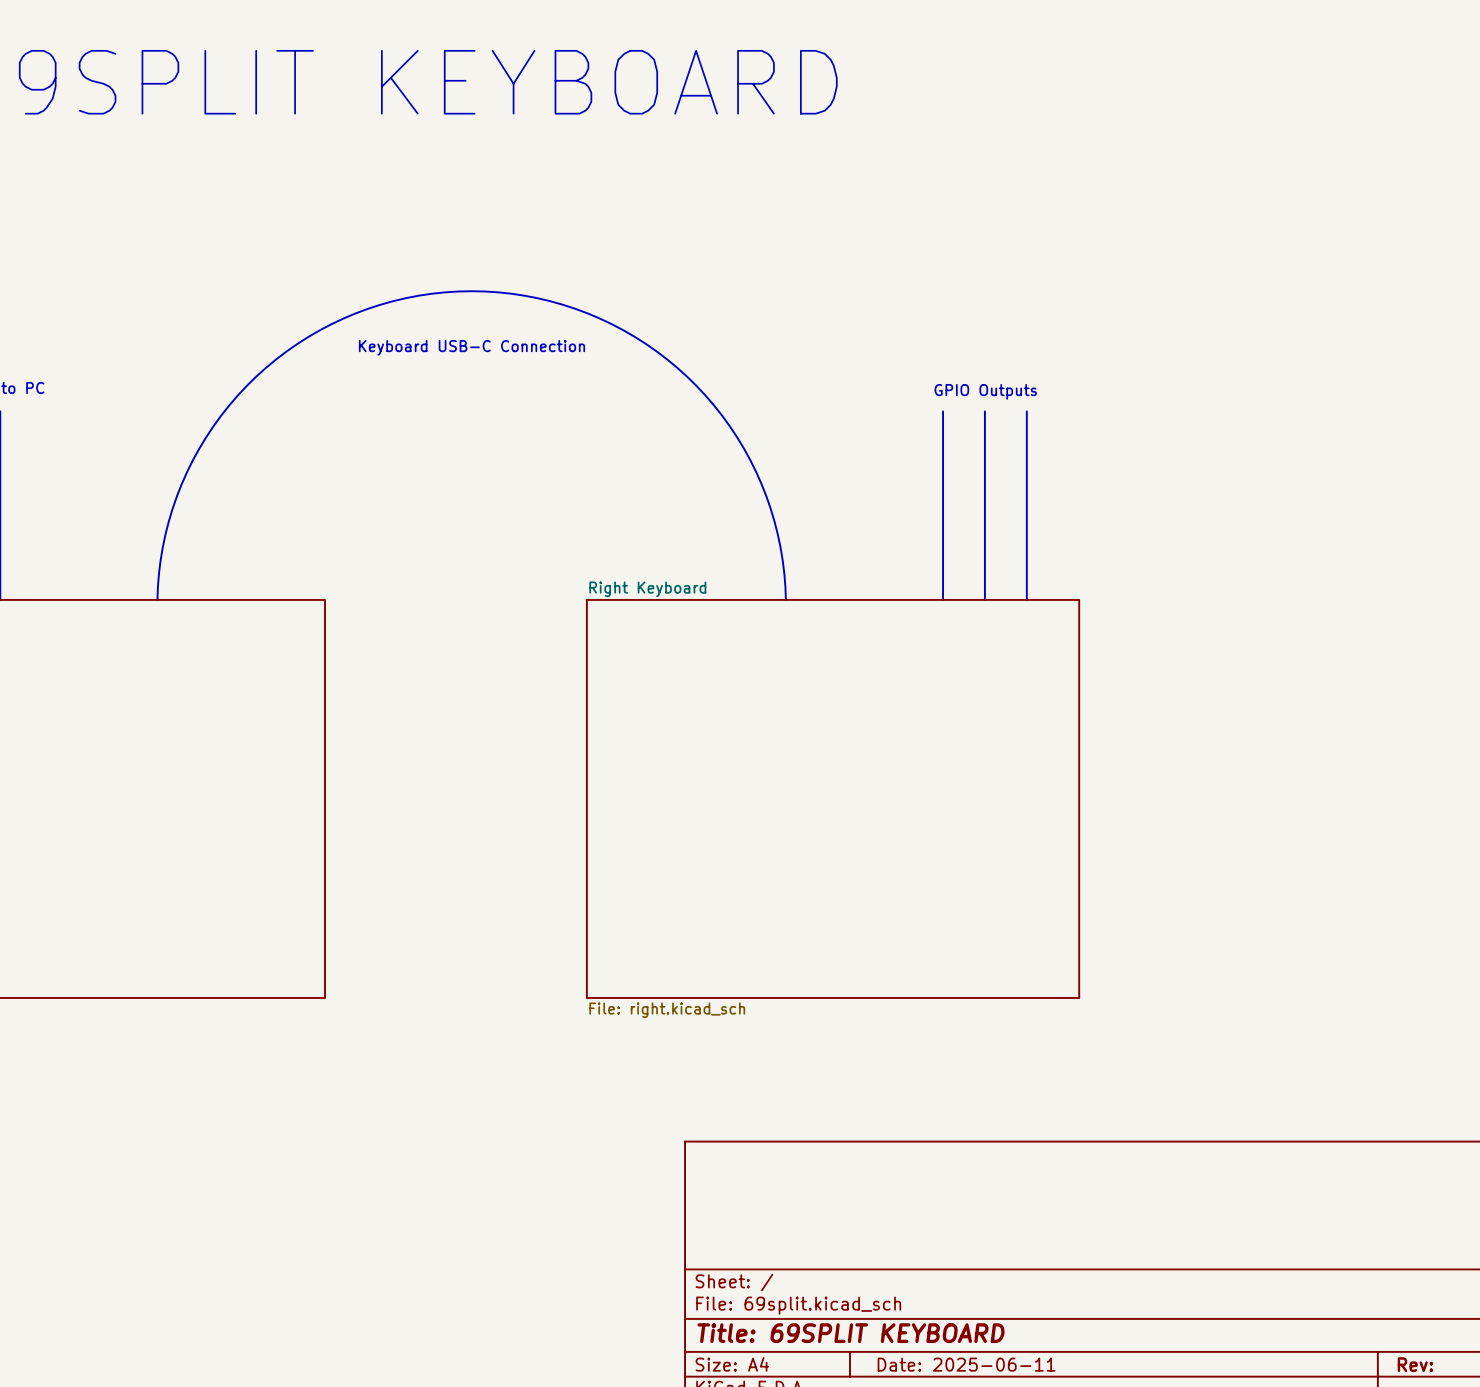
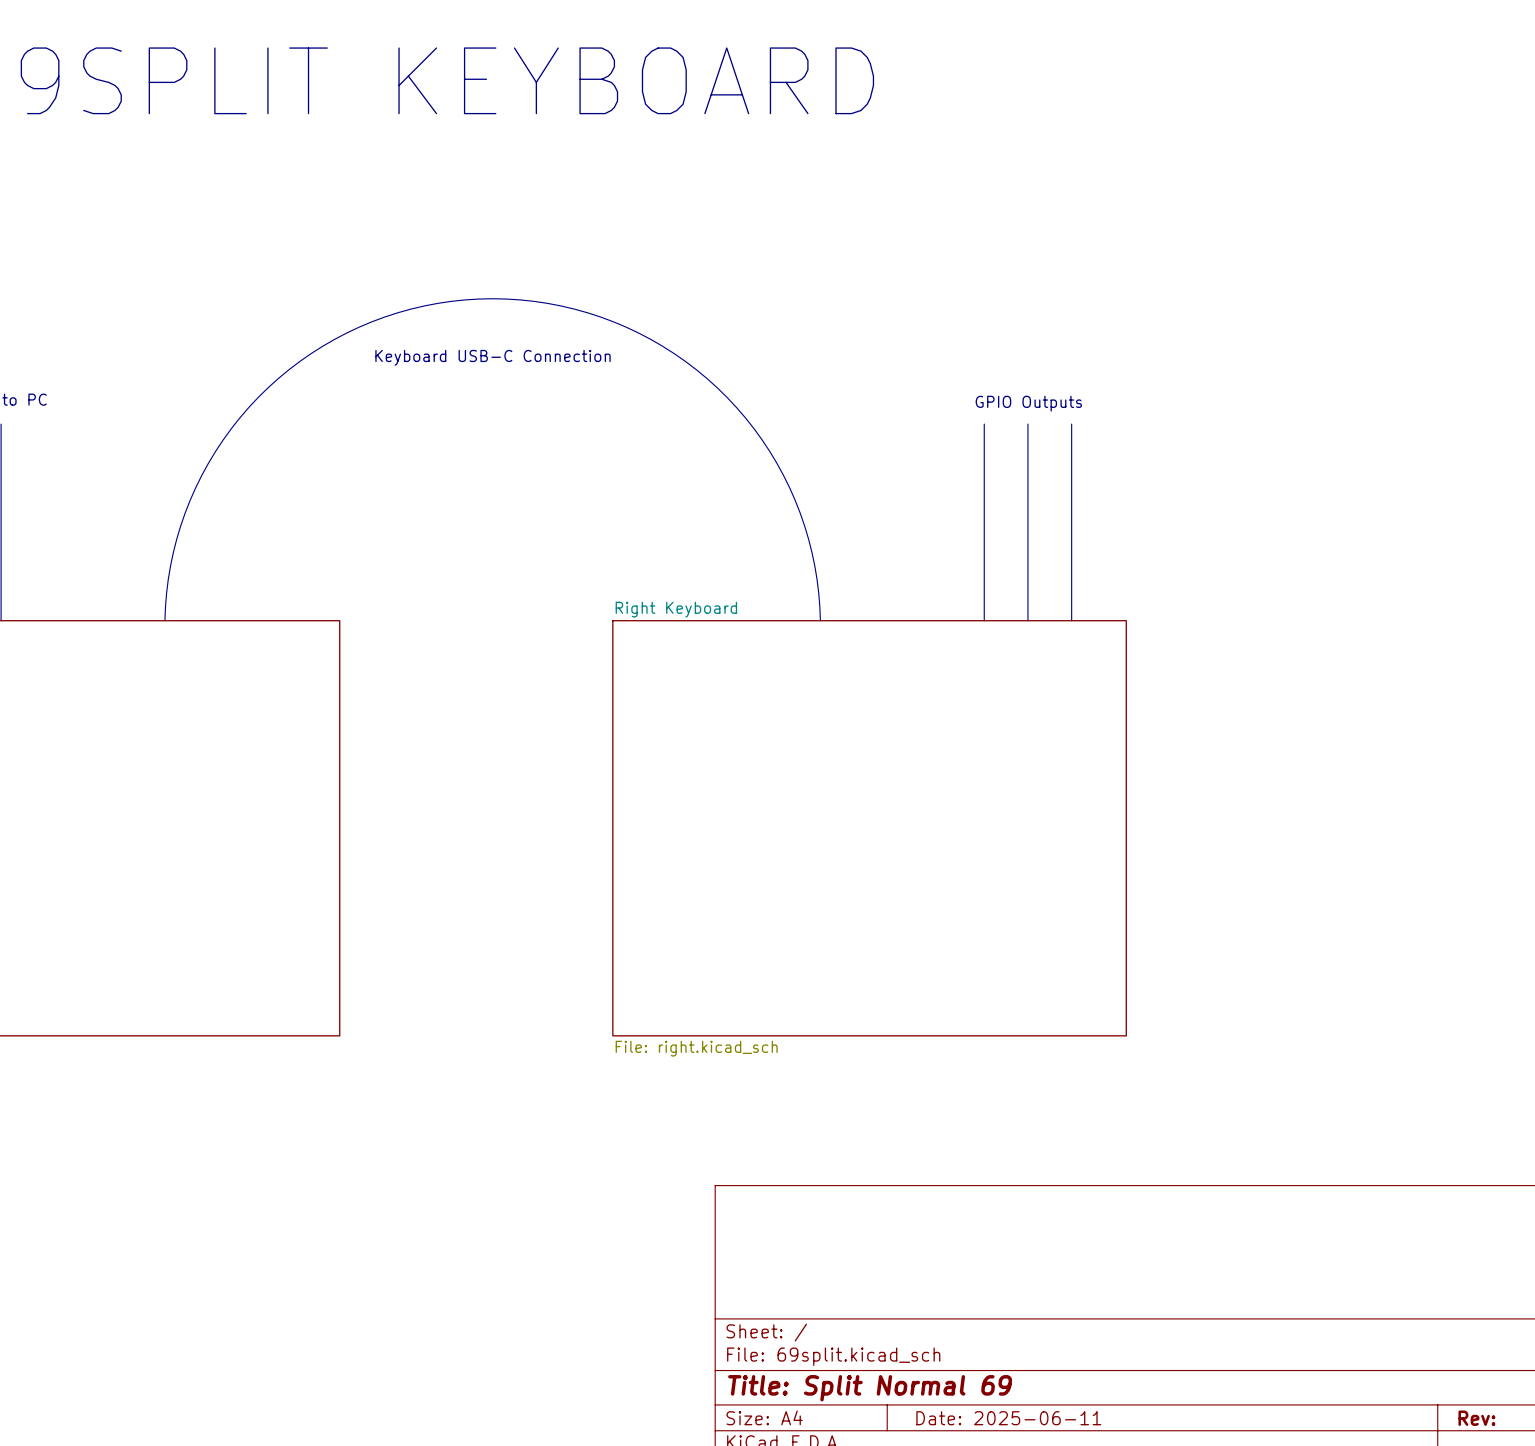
title block: Title: 69SPLIT KEYBOARD (851, 1333) -> Title: Split Normal 69 (870, 1388)

